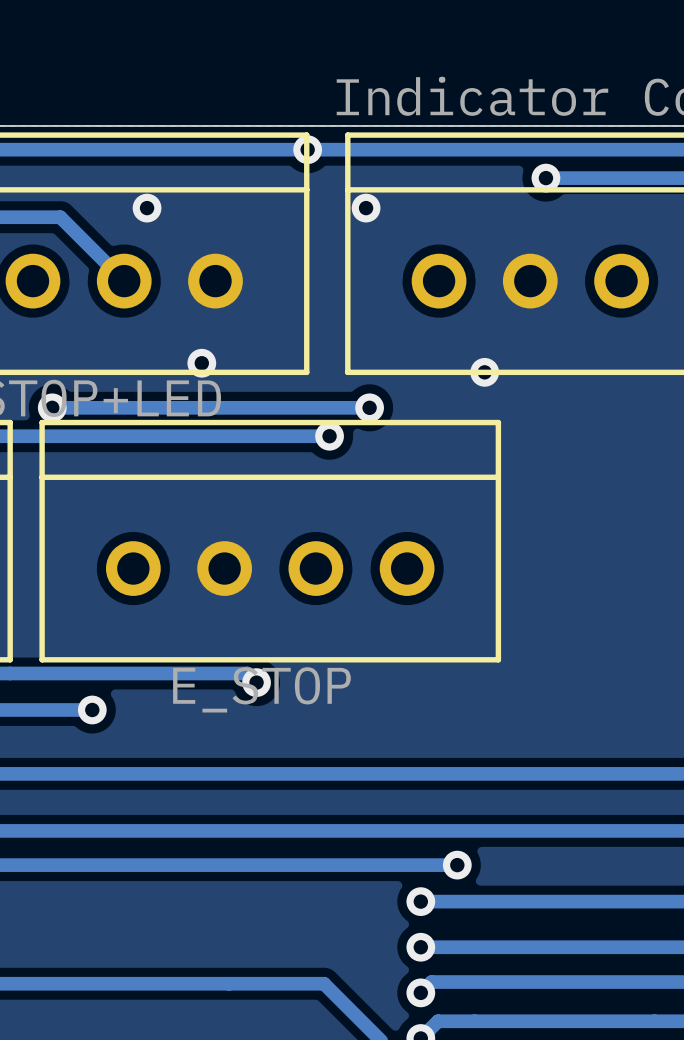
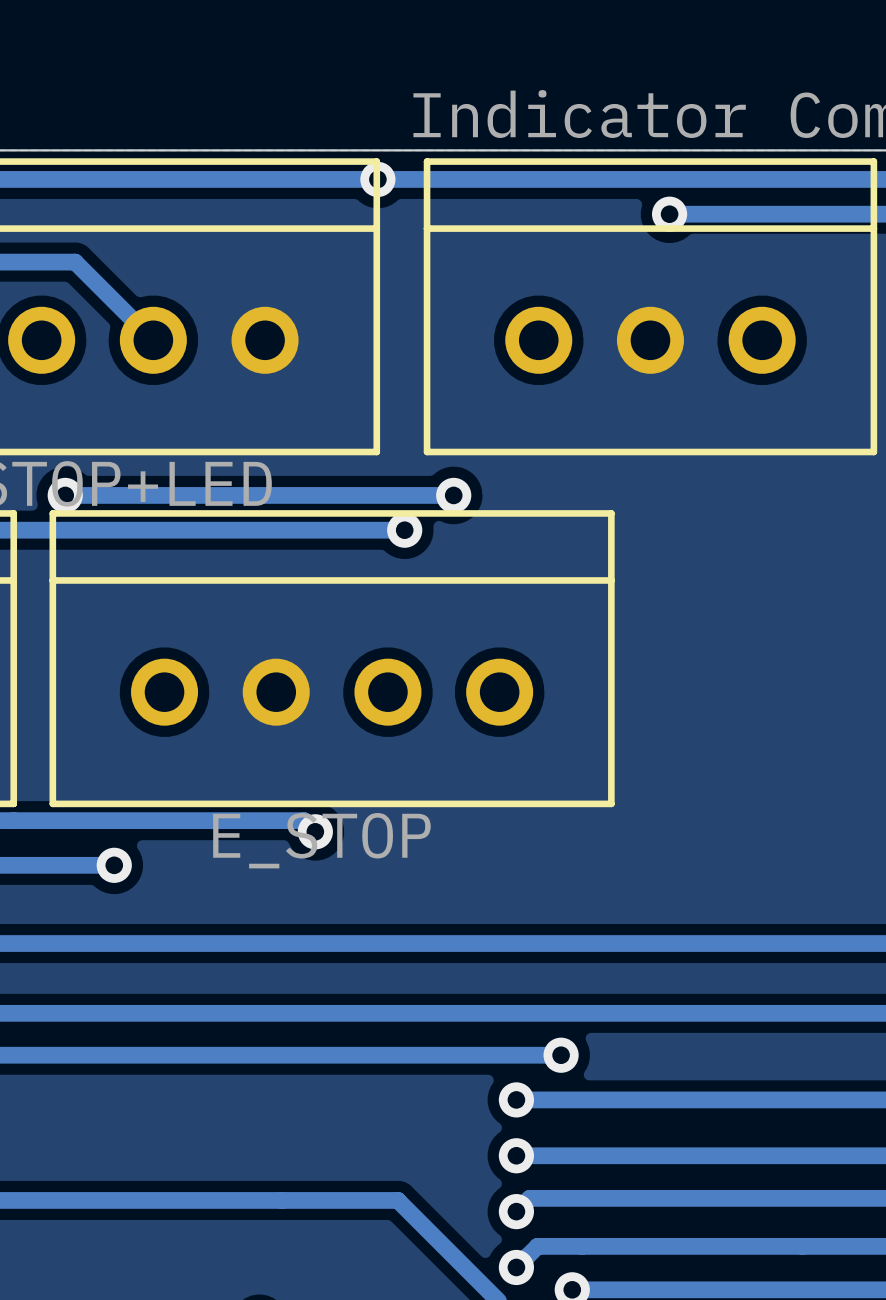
via: (147, 208) -> none
via: (366, 208) -> none
via: (201, 363) -> none
via: (484, 372) -> none

